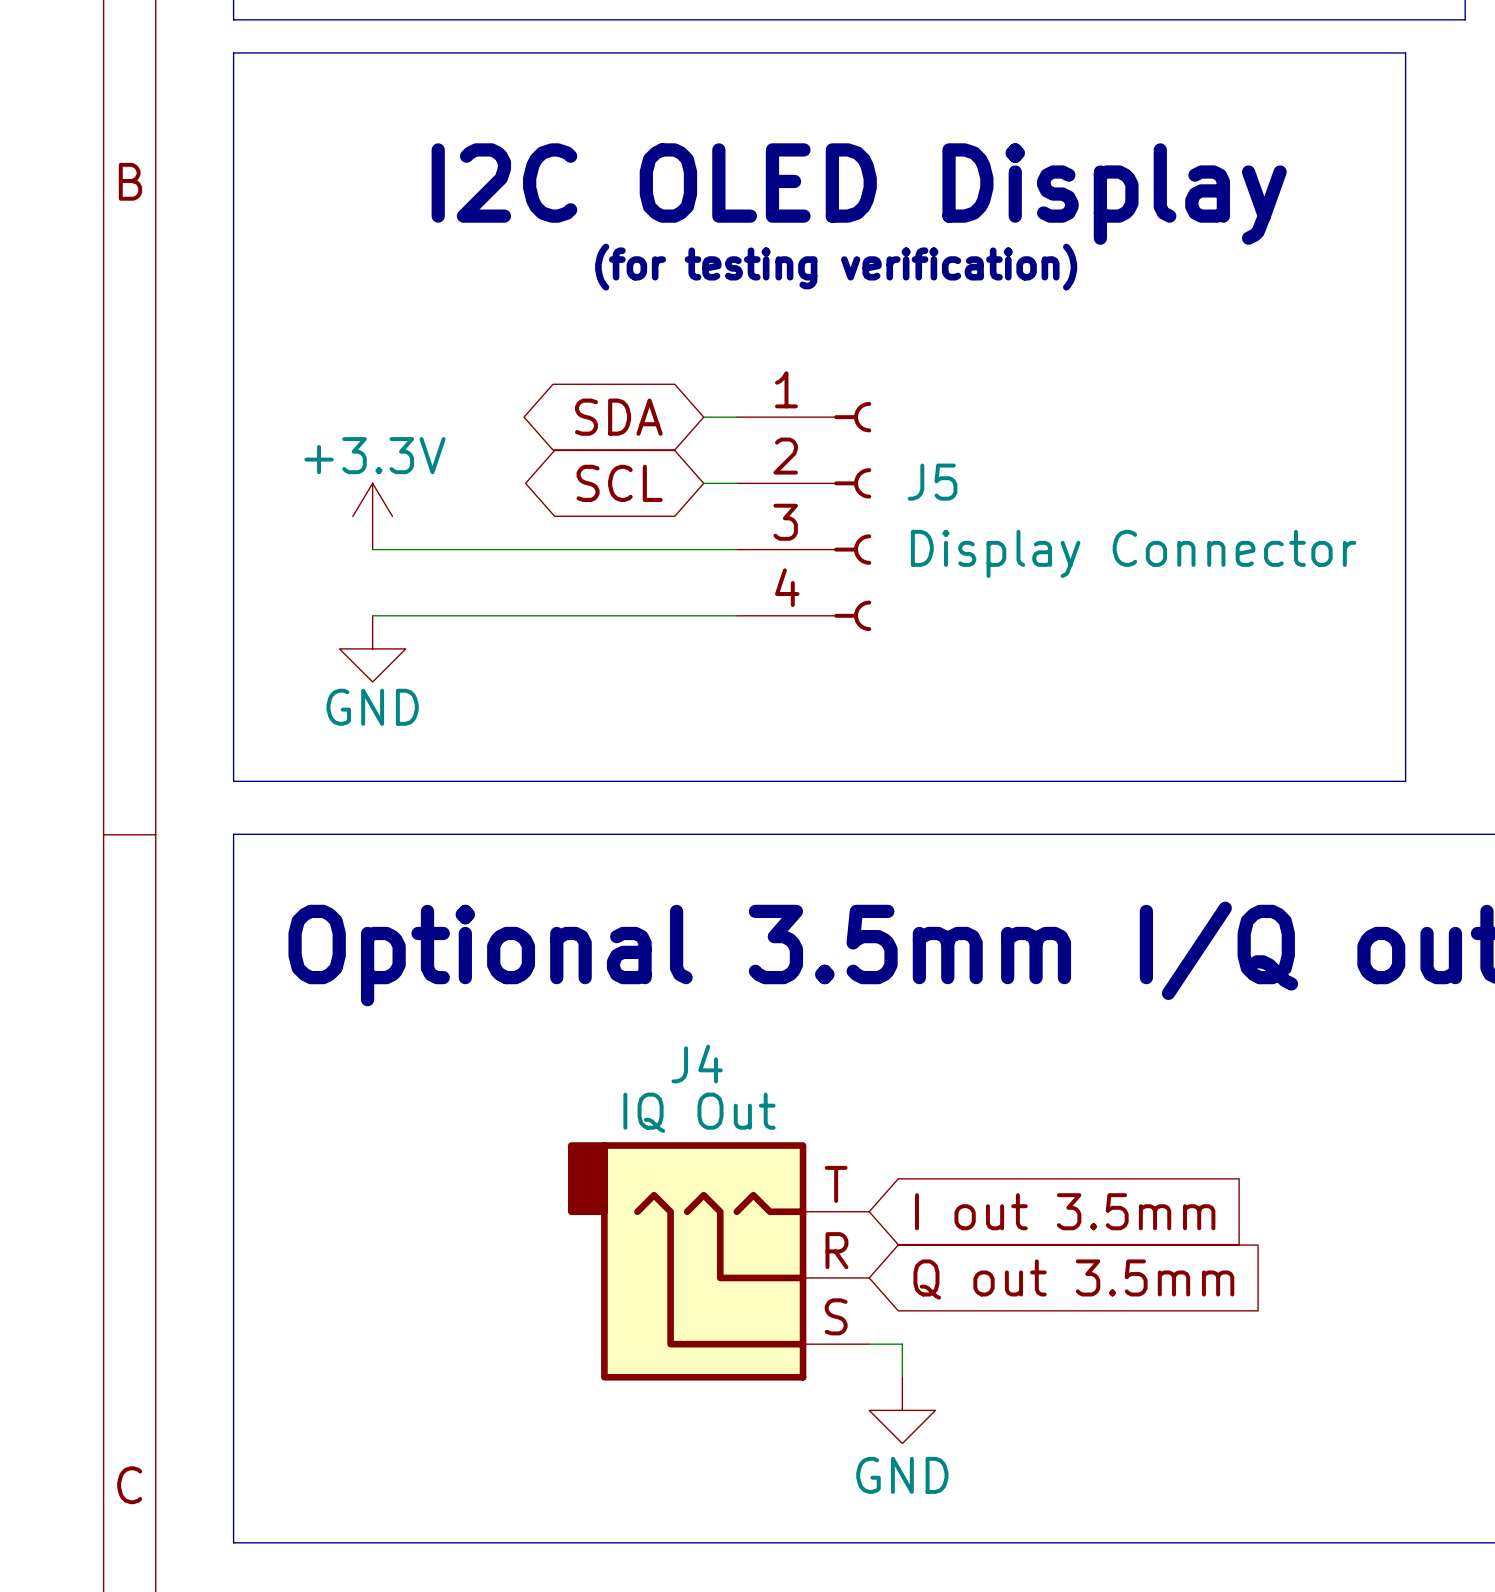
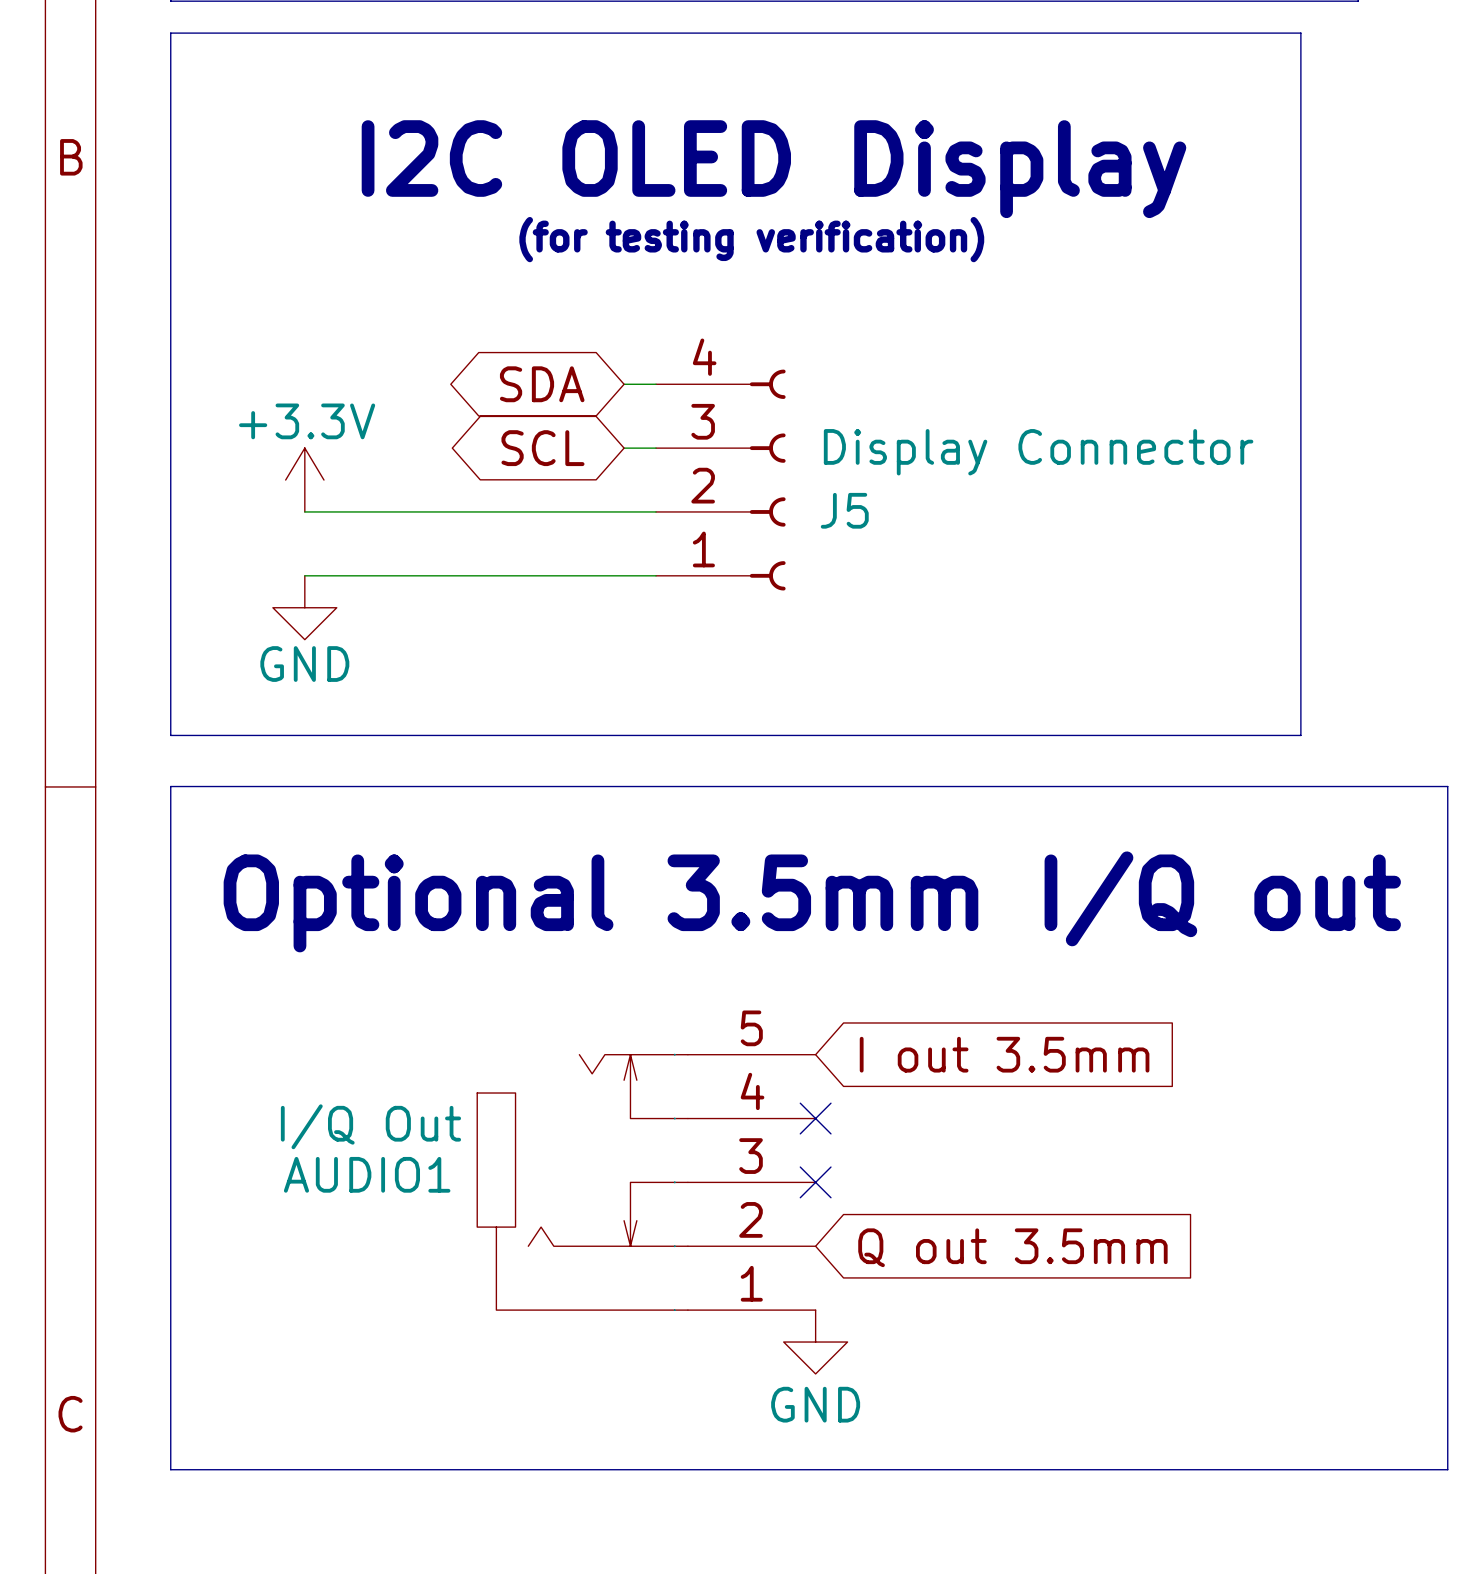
J5 flip: as is (852, 516) -> up-down (767, 480)
no-connect mark: none -> (815, 1118)
global label position: I out 3.5mm (1065, 1211) -> I out 3.5mm (1004, 1054)
AUDIO1: none -> I/Q Out (646, 1182)
no-connect mark: none -> (815, 1182)
J4: IQ Out (718, 1261) -> none
global label position: Q out 3.5mm (1073, 1279) -> Q out 3.5mm (1012, 1247)
wire: (869, 1344) (902, 1344) (902, 1377) -> none

